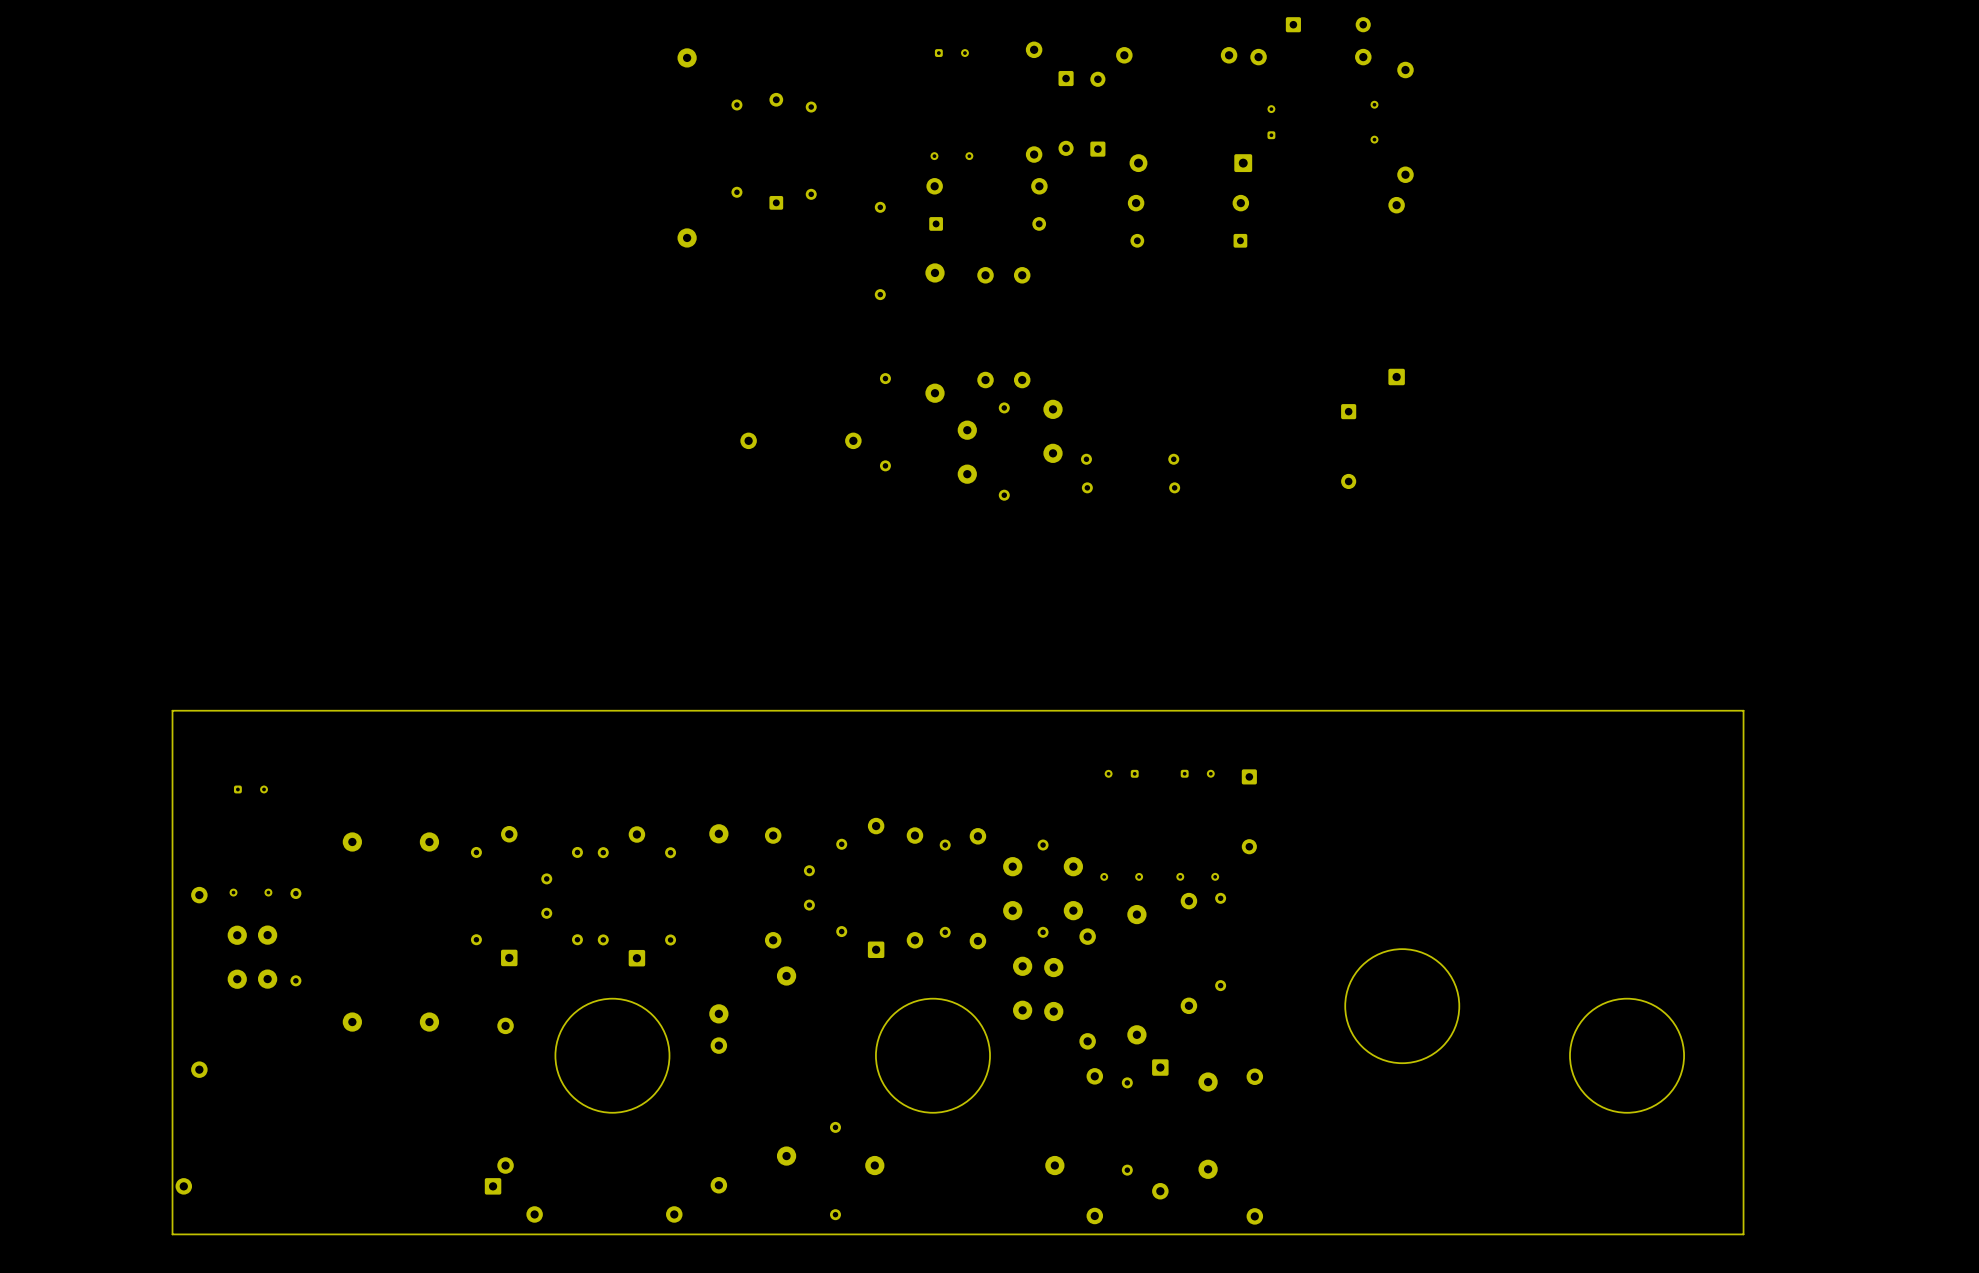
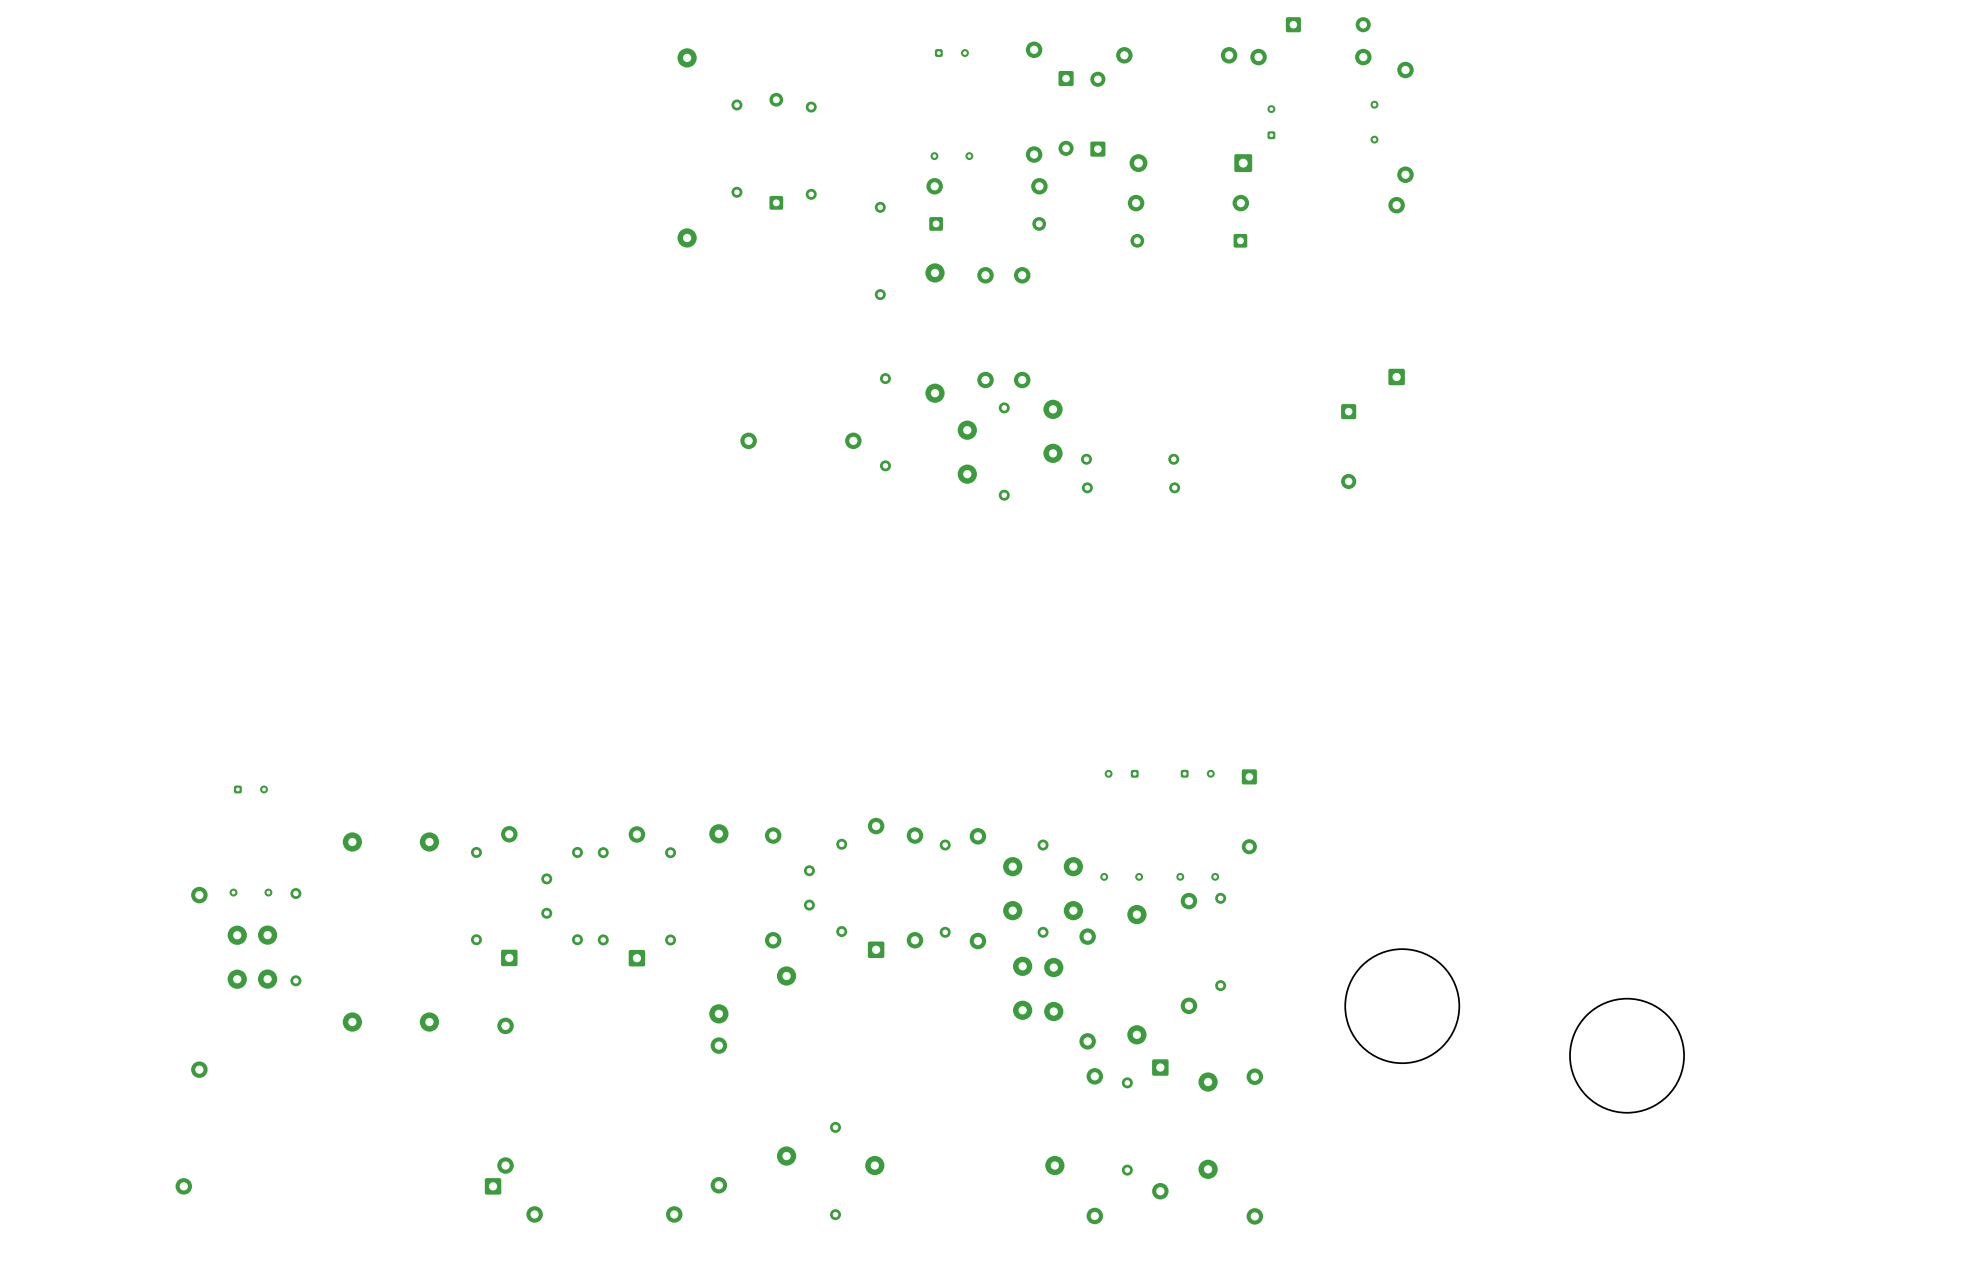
board edge: (1743, 710) (172, 710) (172, 1234) (1743, 1234) (1743, 710) -> none
part: (612, 1055) -> none
part: (932, 1055) -> none

